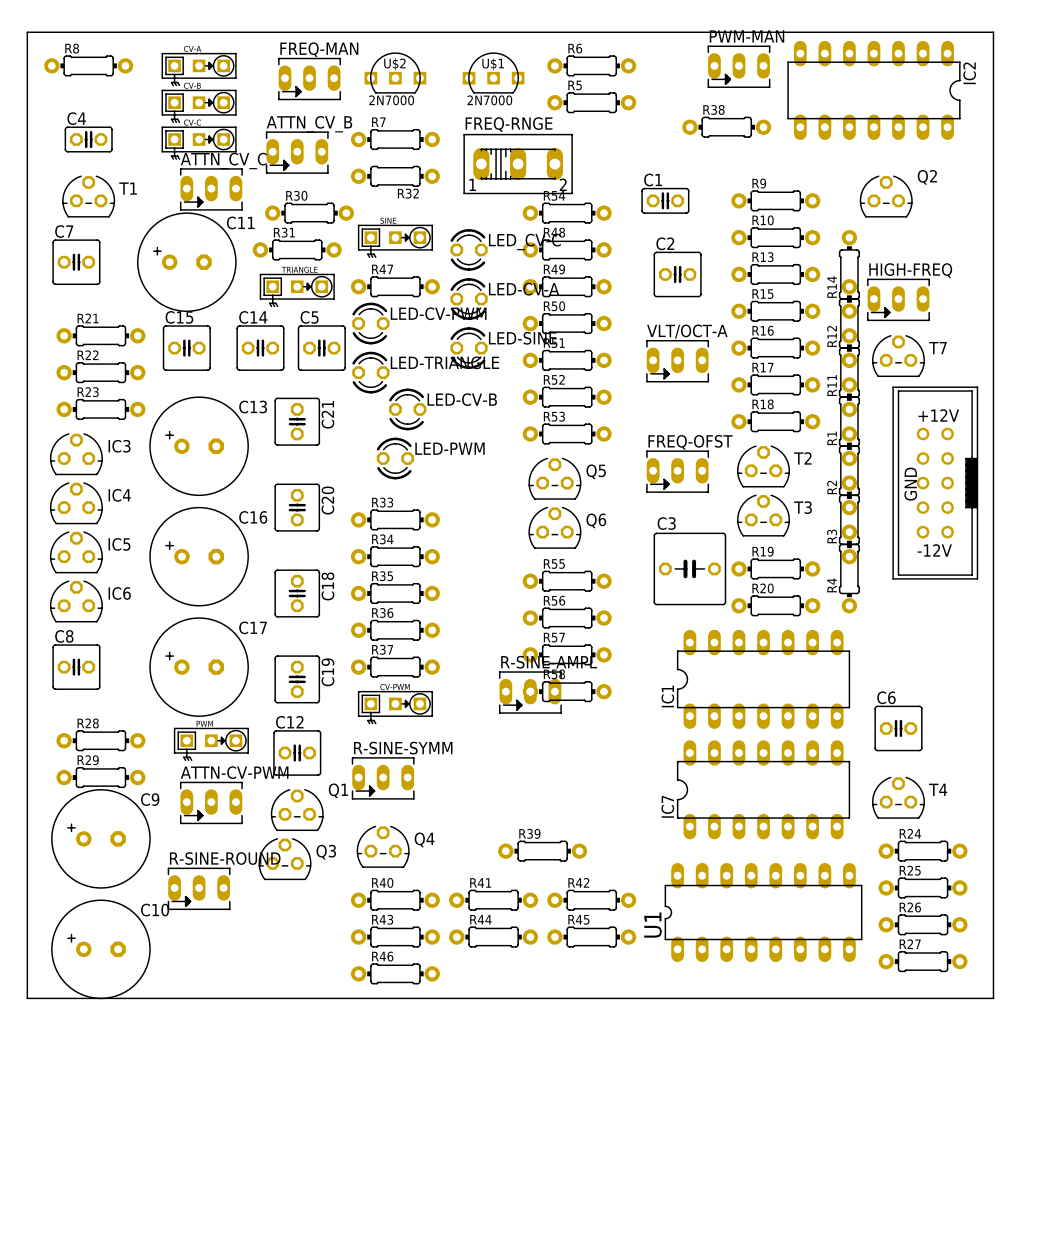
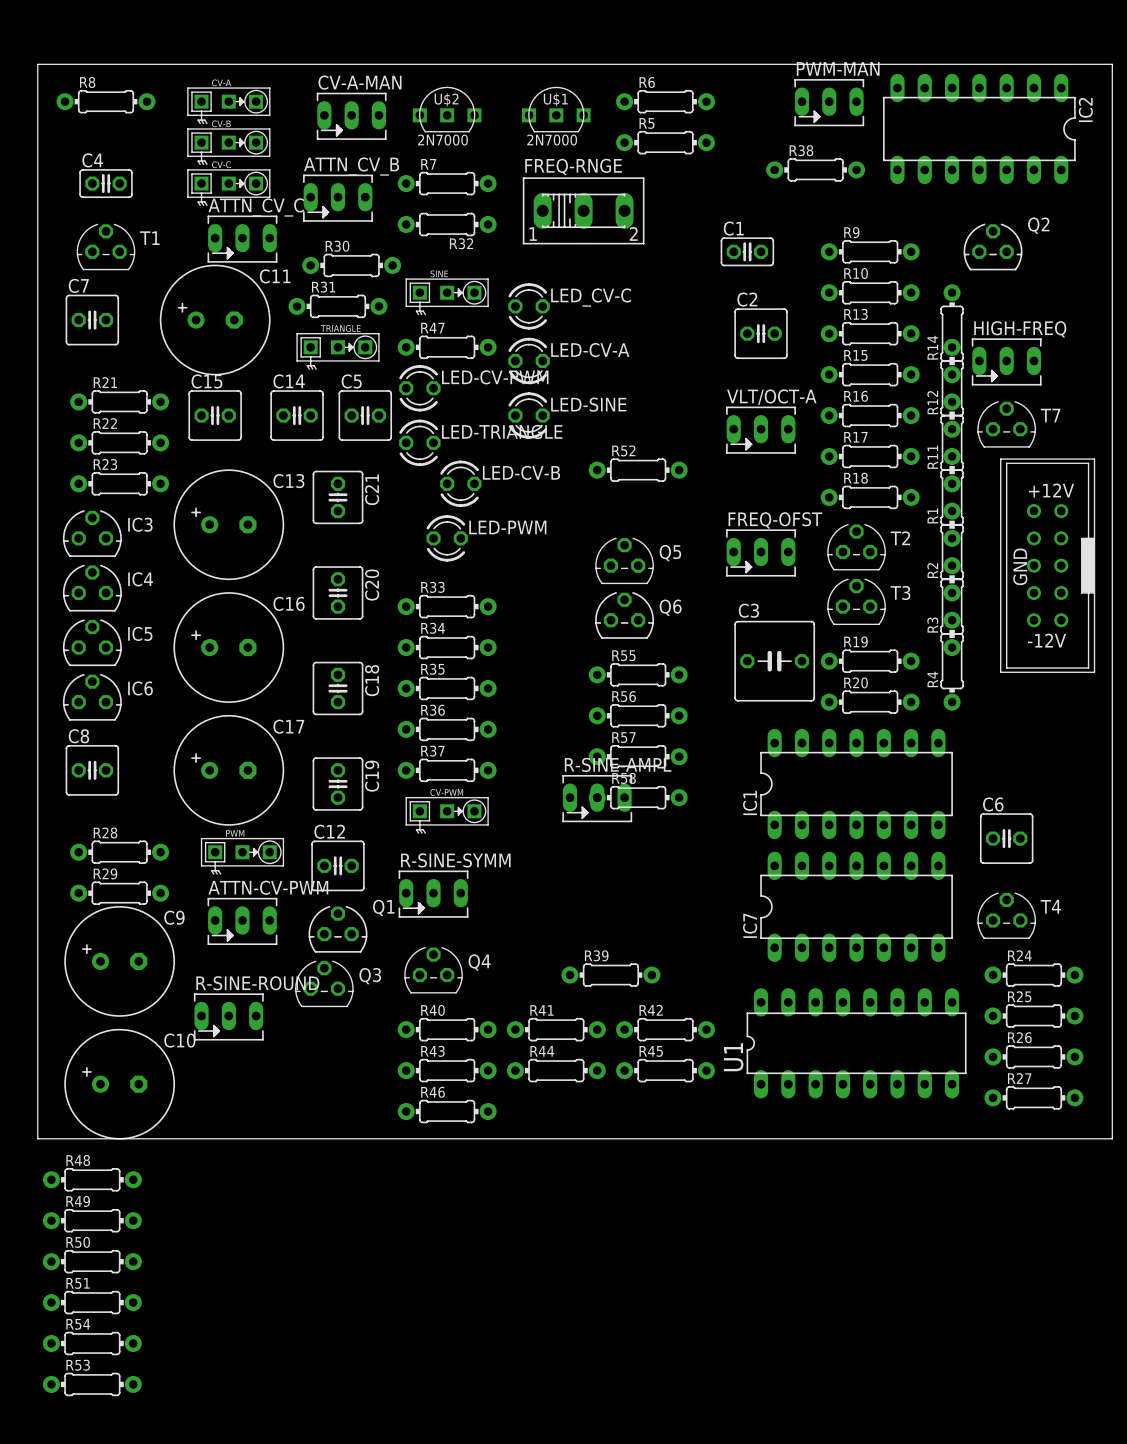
FREQ-MAN name: FREQ-MAN (319, 49) -> CV-A-MAN (359, 82)
R54 position: (567, 213) -> (92, 1343)
R48 position: (567, 249) -> (92, 1179)
R49 position: (567, 286) -> (92, 1220)
R50 position: (567, 323) -> (92, 1261)
R51 position: (567, 360) -> (92, 1302)
R53 position: (567, 433) -> (92, 1384)

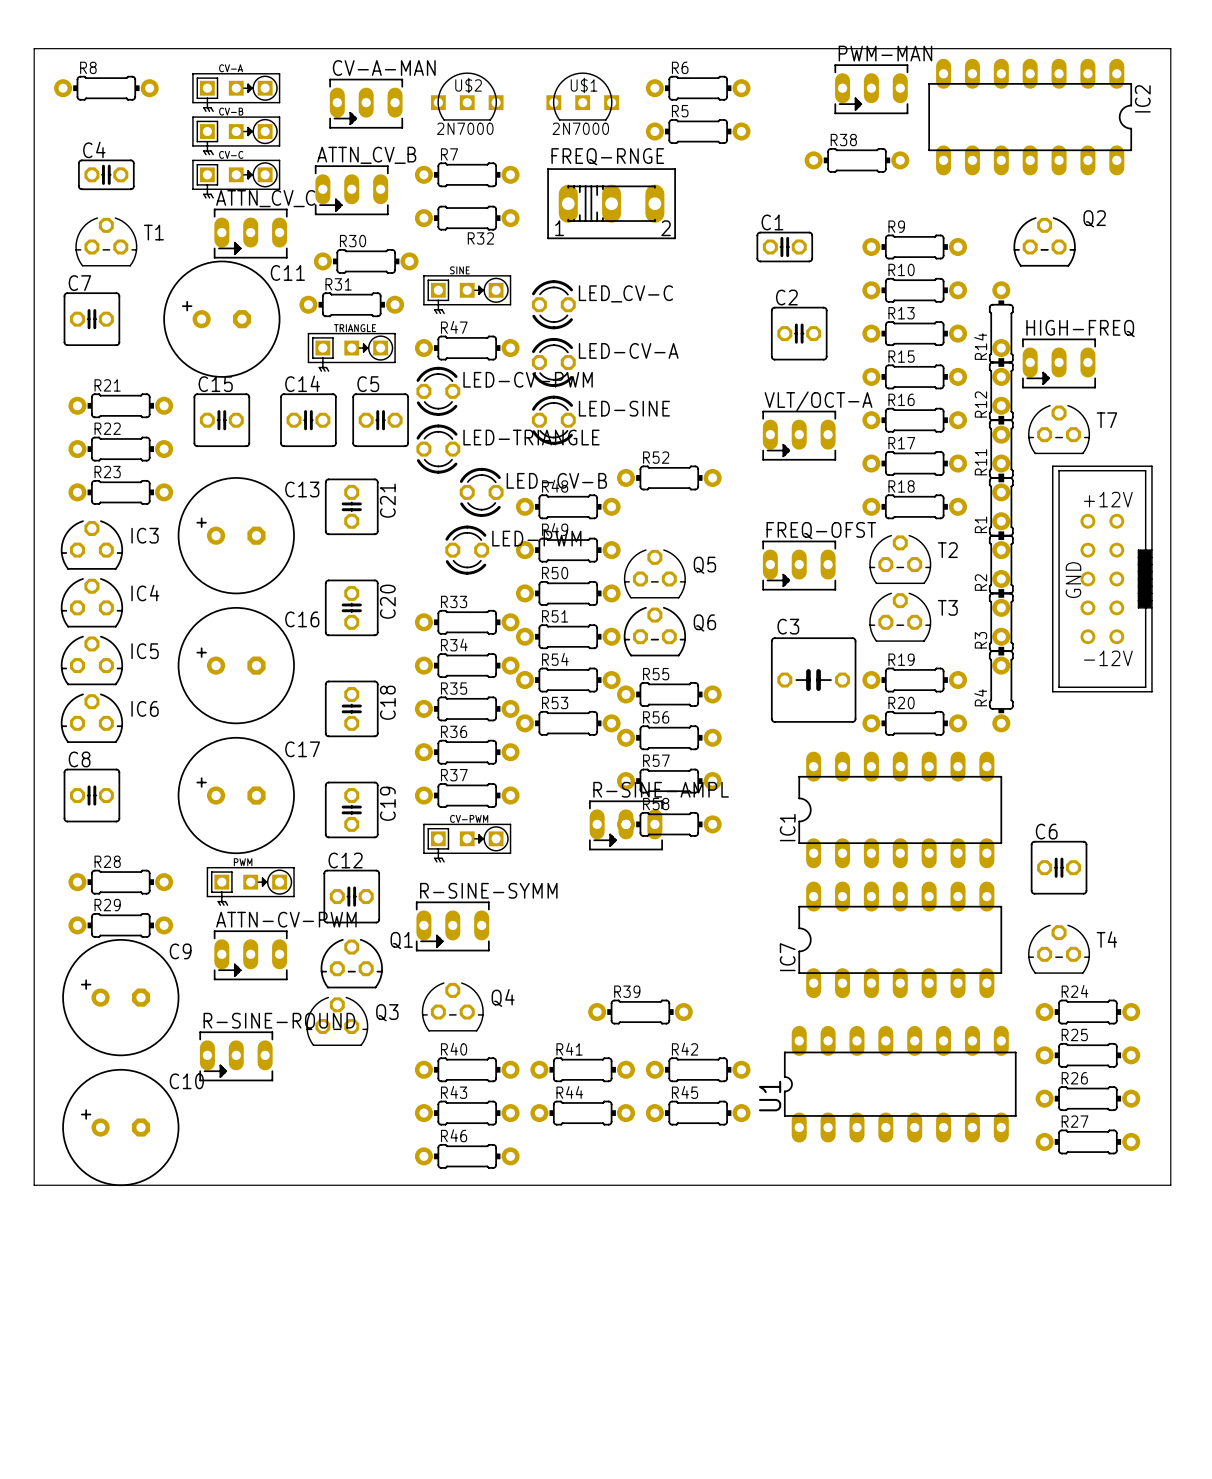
R48 position: (92, 1179) -> (568, 506)
R49 position: (92, 1220) -> (568, 550)
R50 position: (92, 1261) -> (568, 593)
R51 position: (92, 1302) -> (568, 636)
R54 position: (92, 1343) -> (568, 680)
R53 position: (92, 1384) -> (568, 723)

